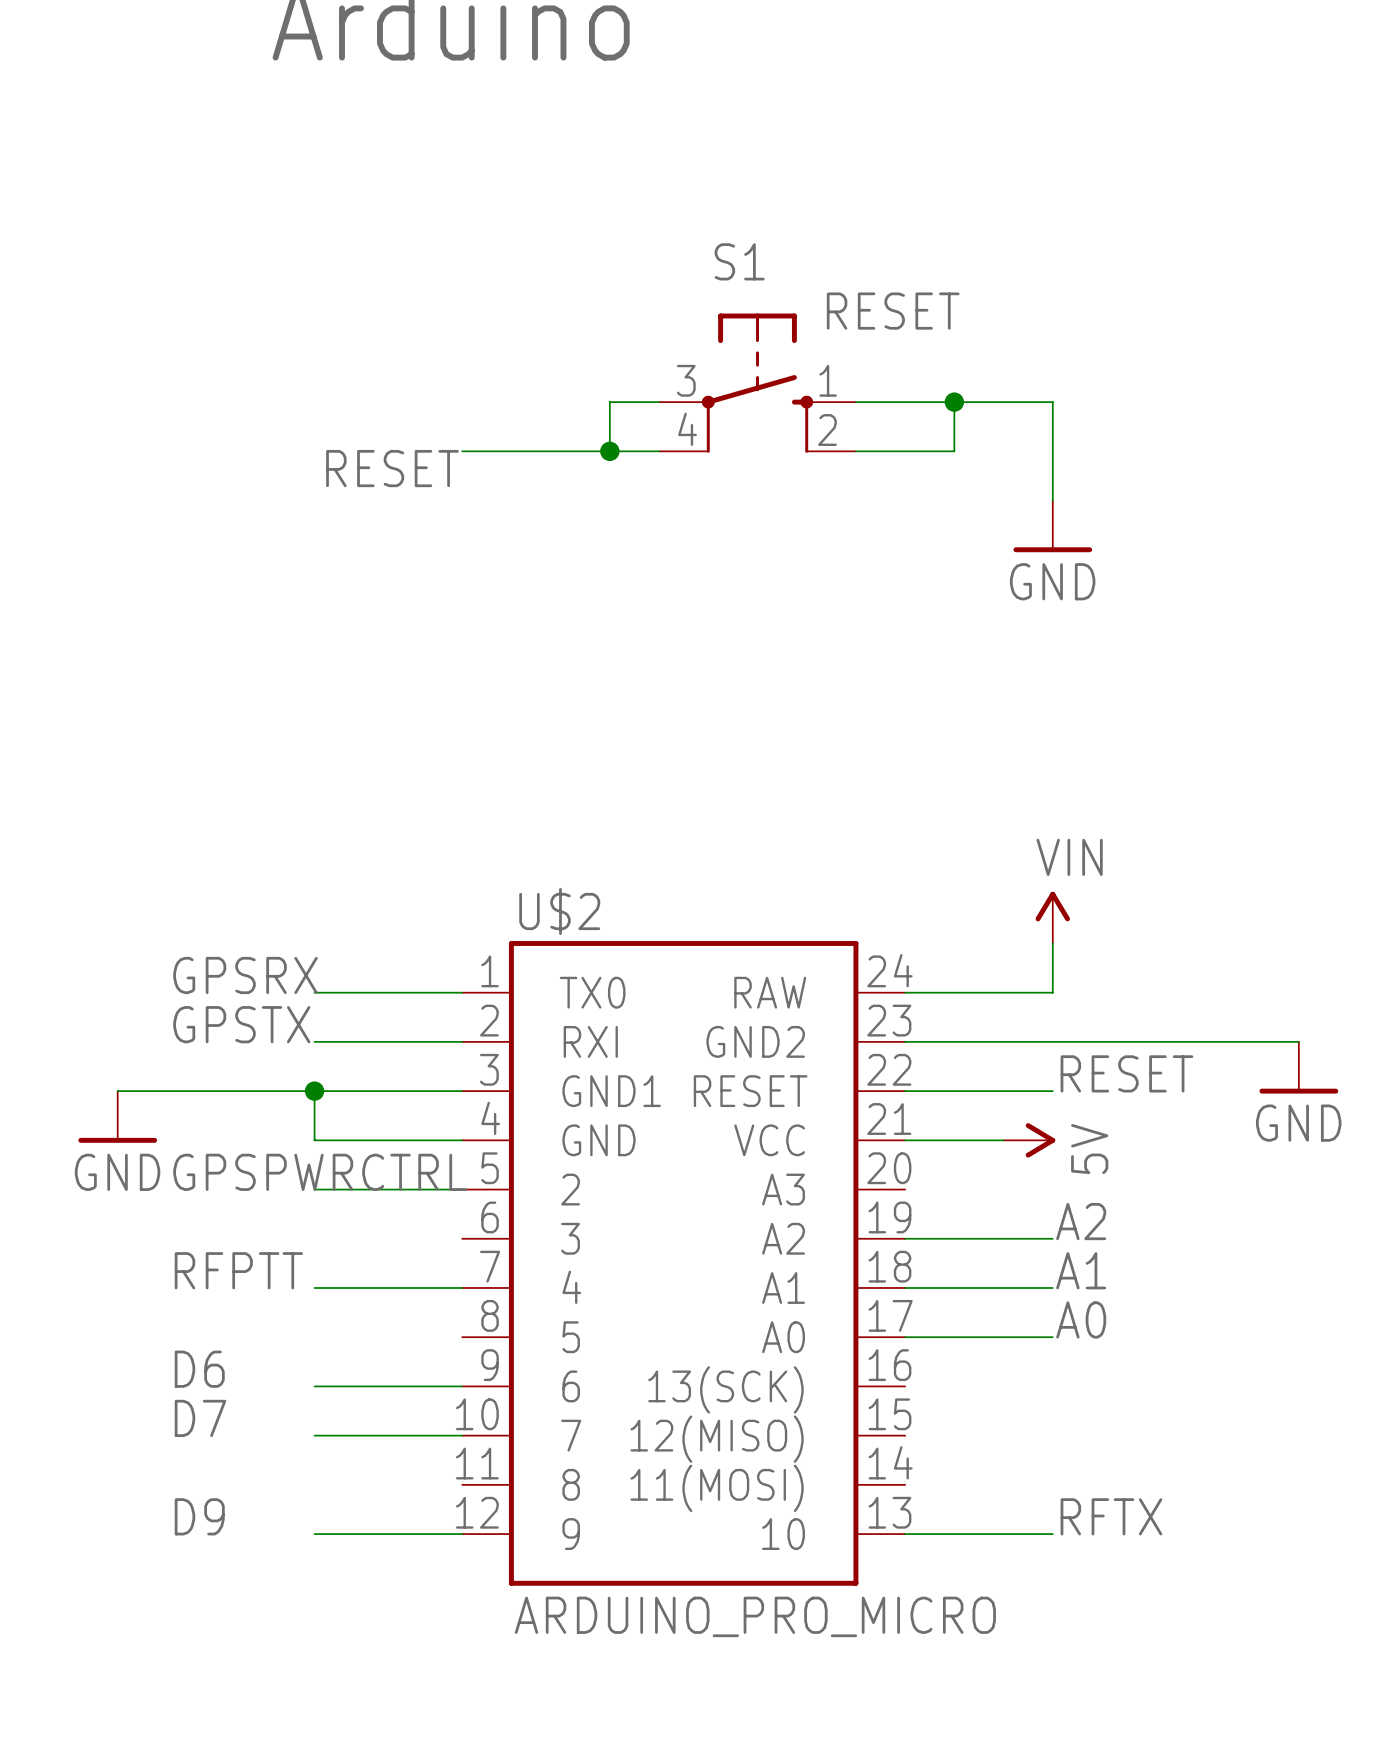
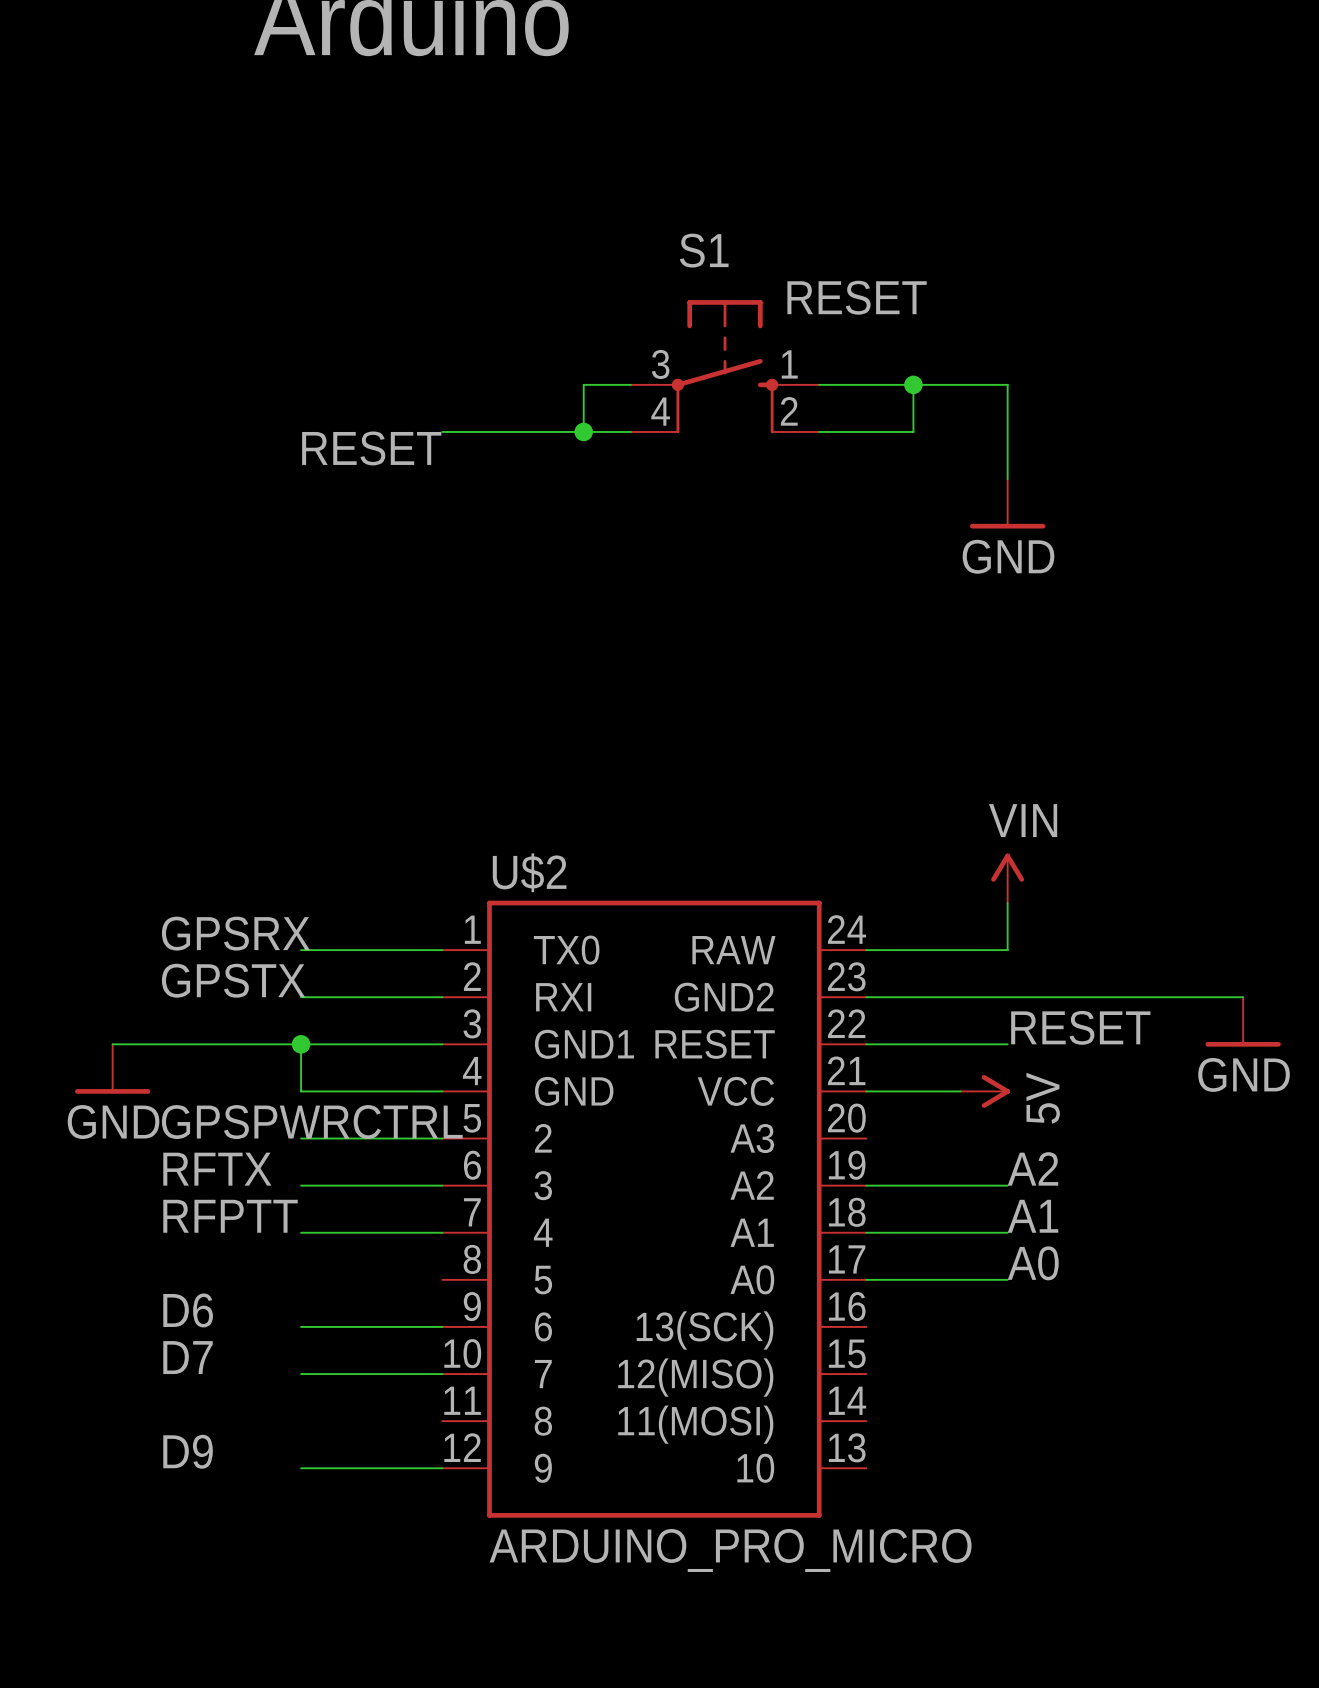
label: none -> RFTX (217, 1169)
wire: none -> (301, 1185) (442, 1185)
label: RFTX (1111, 1516) -> none
wire: (905, 1534) (1052, 1534) -> none

